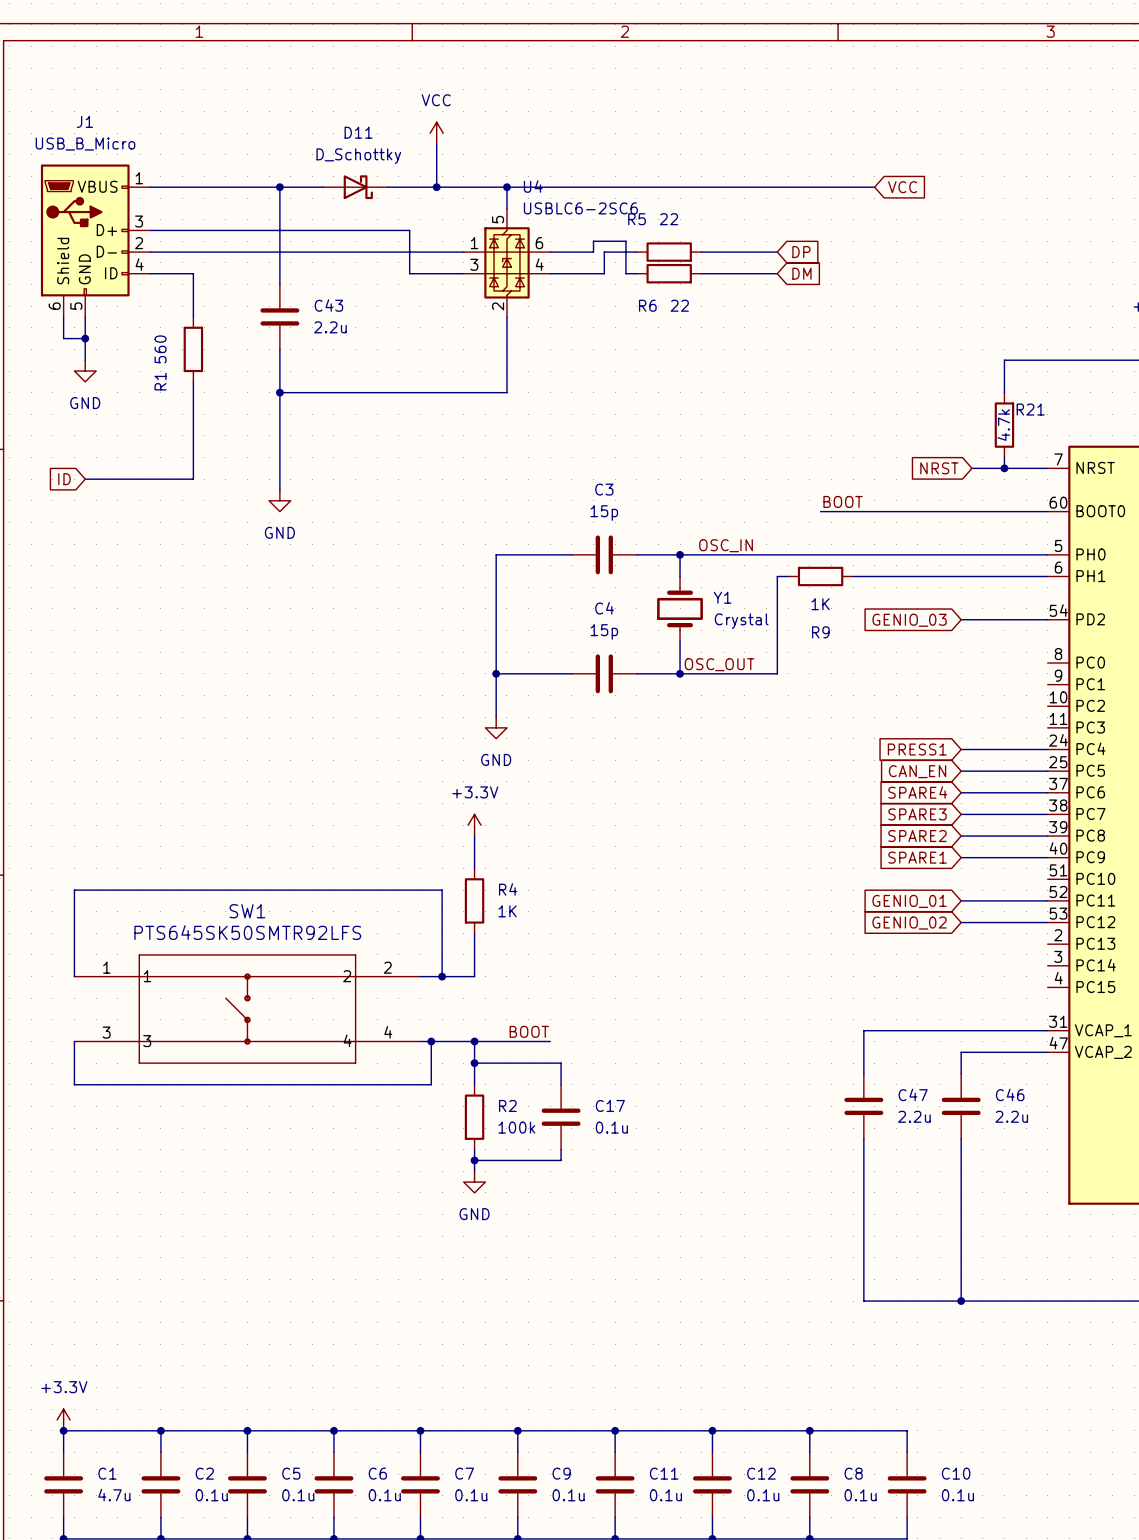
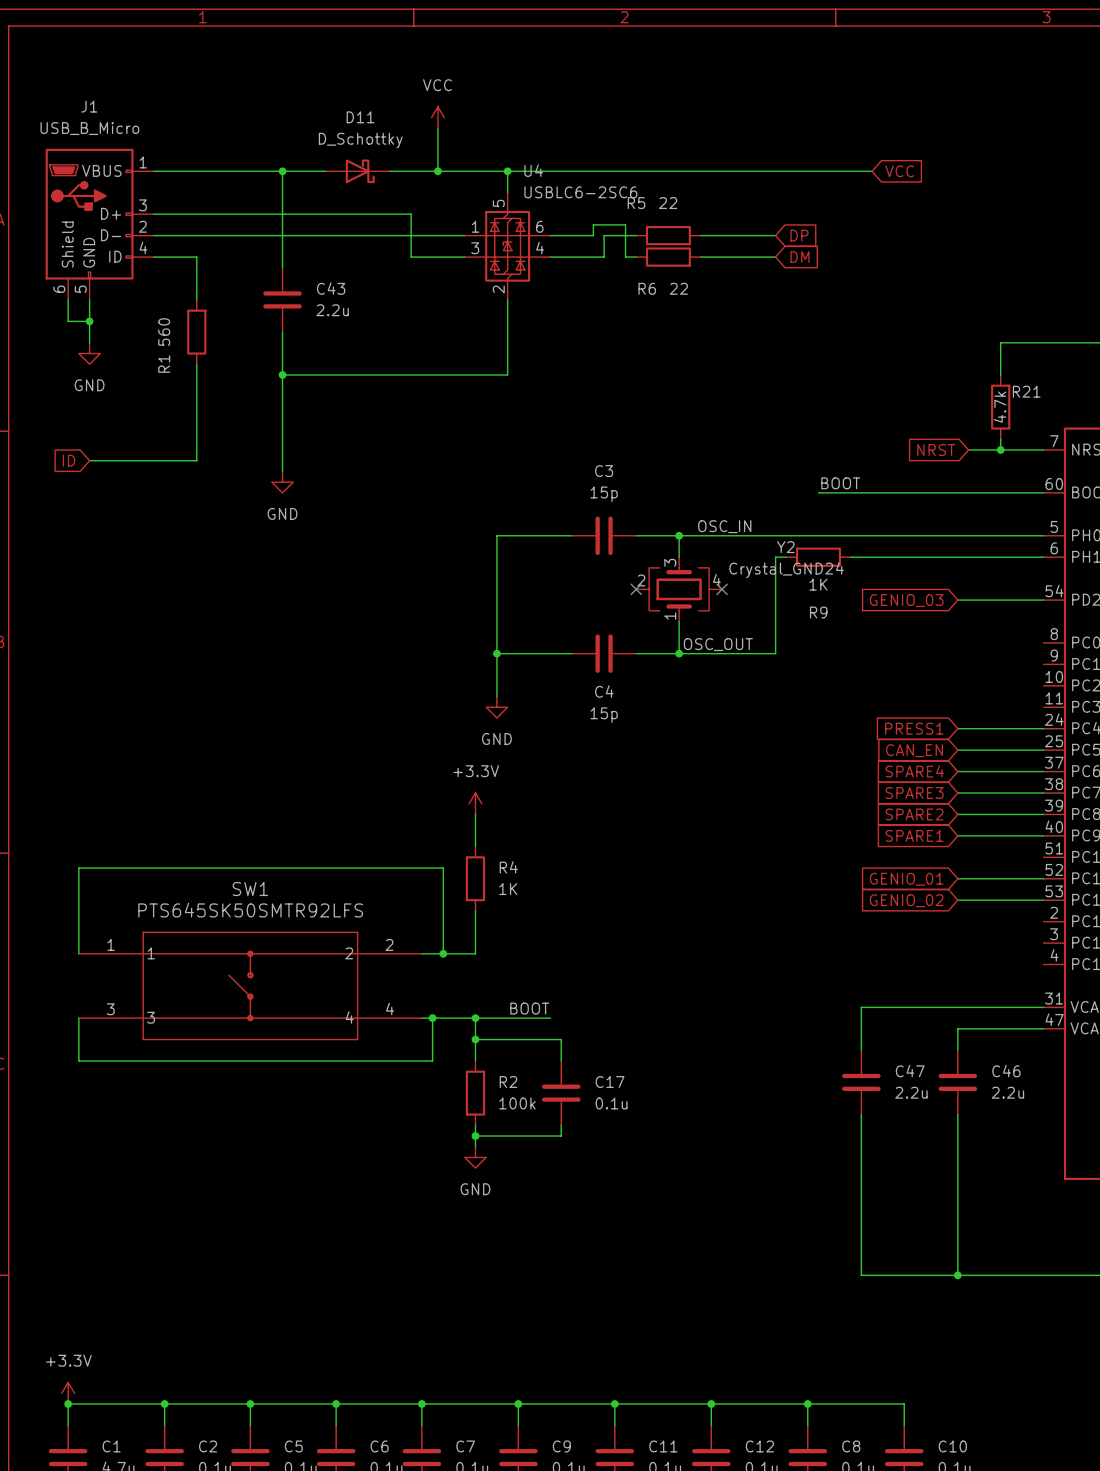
C4 name position: C4 (604, 608) -> C4 (604, 691)
no-connect mark: none -> (636, 589)
Y1: Crystal (680, 608) -> none
Y2: none -> Crystal_GND24 (679, 589)
no-connect mark: none -> (722, 589)
C4 value position: 15p (604, 631) -> 15p (604, 715)

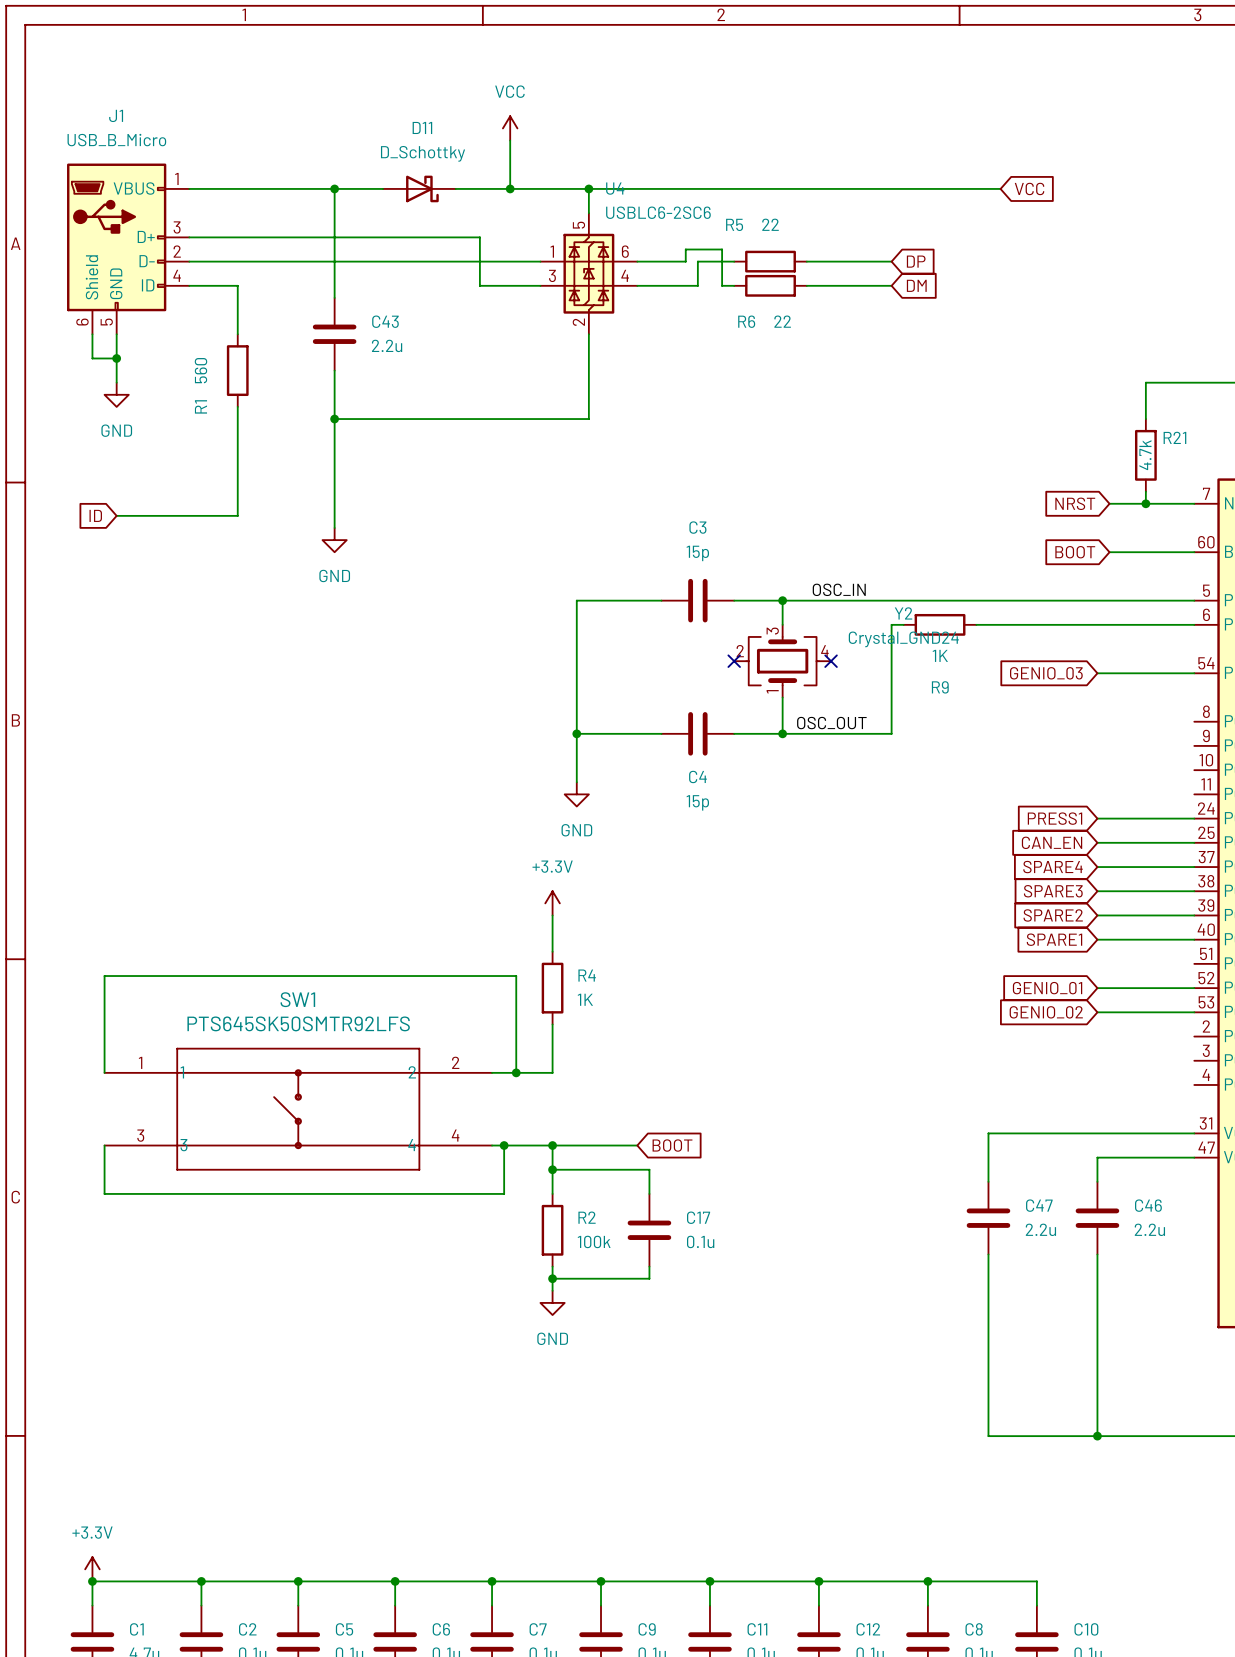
label: BOOT (840, 483) -> none
wire: (818, 492) (968, 492) -> none
global label: none -> BOOT (1075, 552)
label: BOOT (529, 1008) -> none
global label: none -> BOOT (672, 1145)

